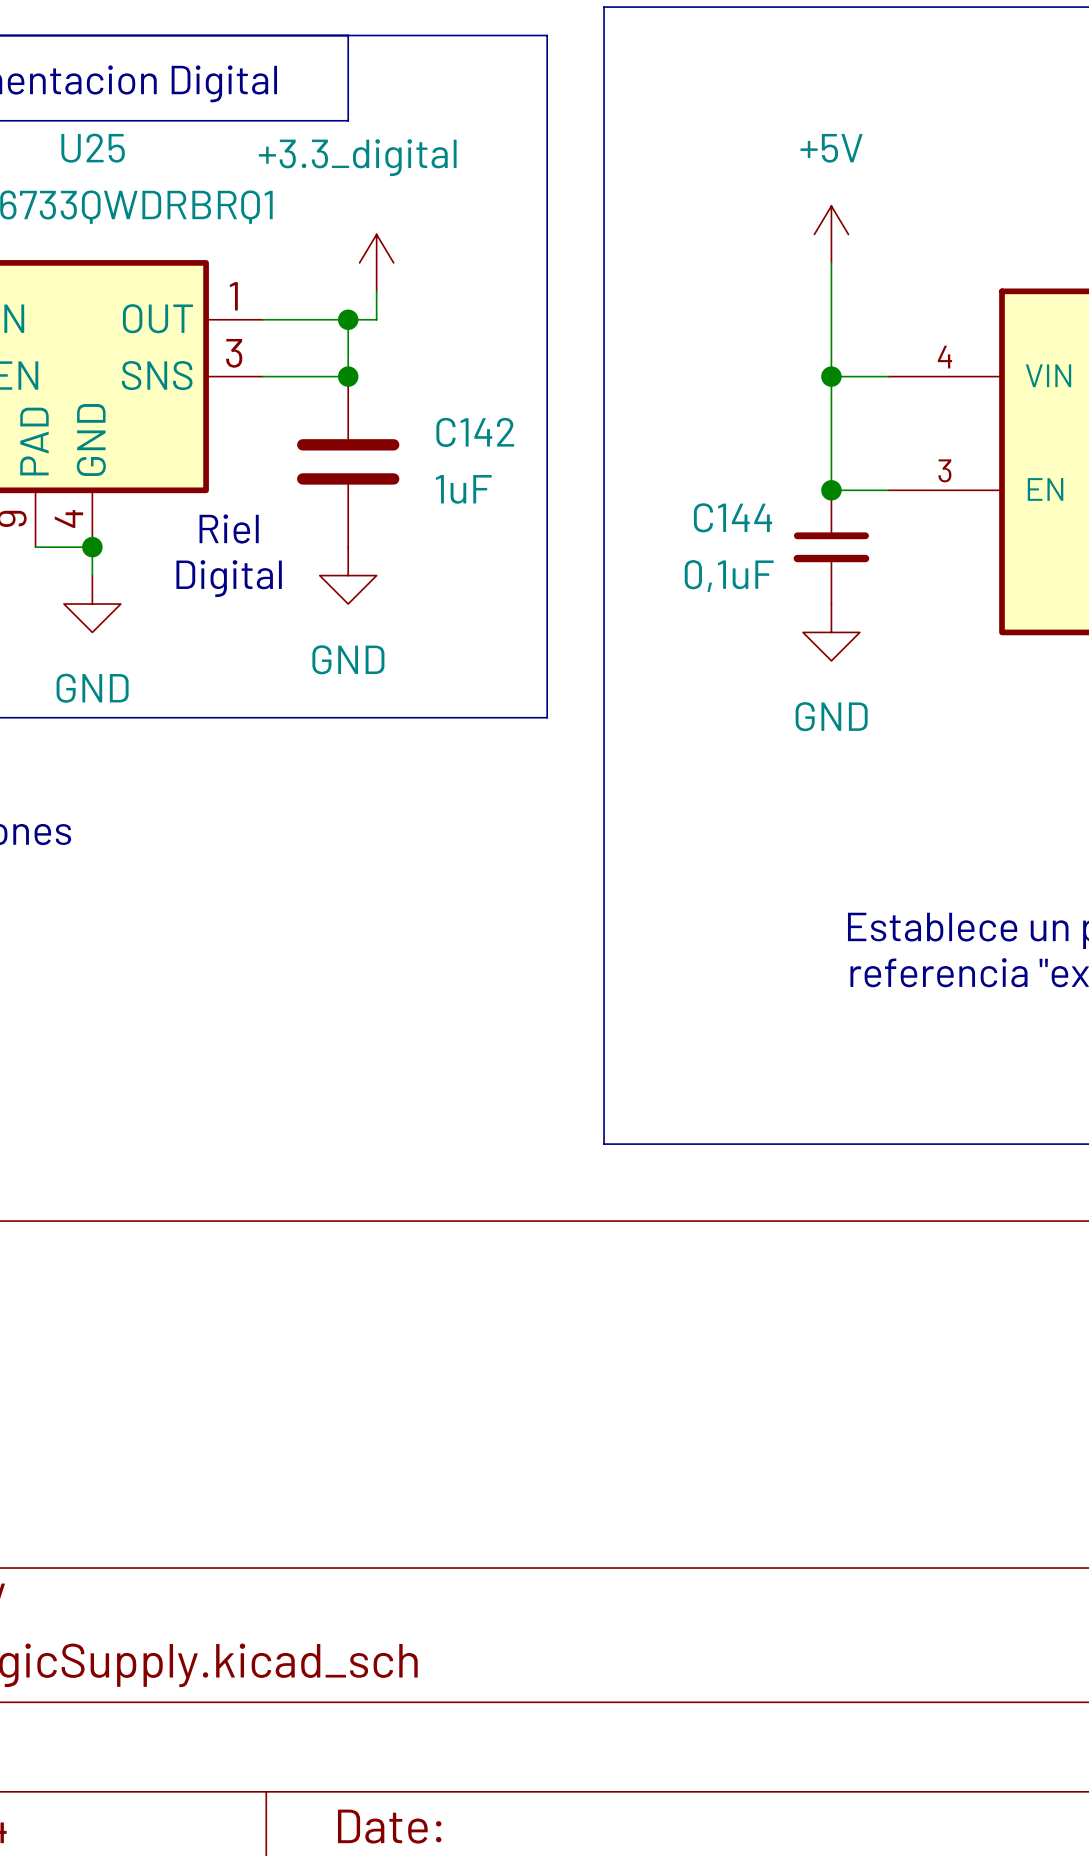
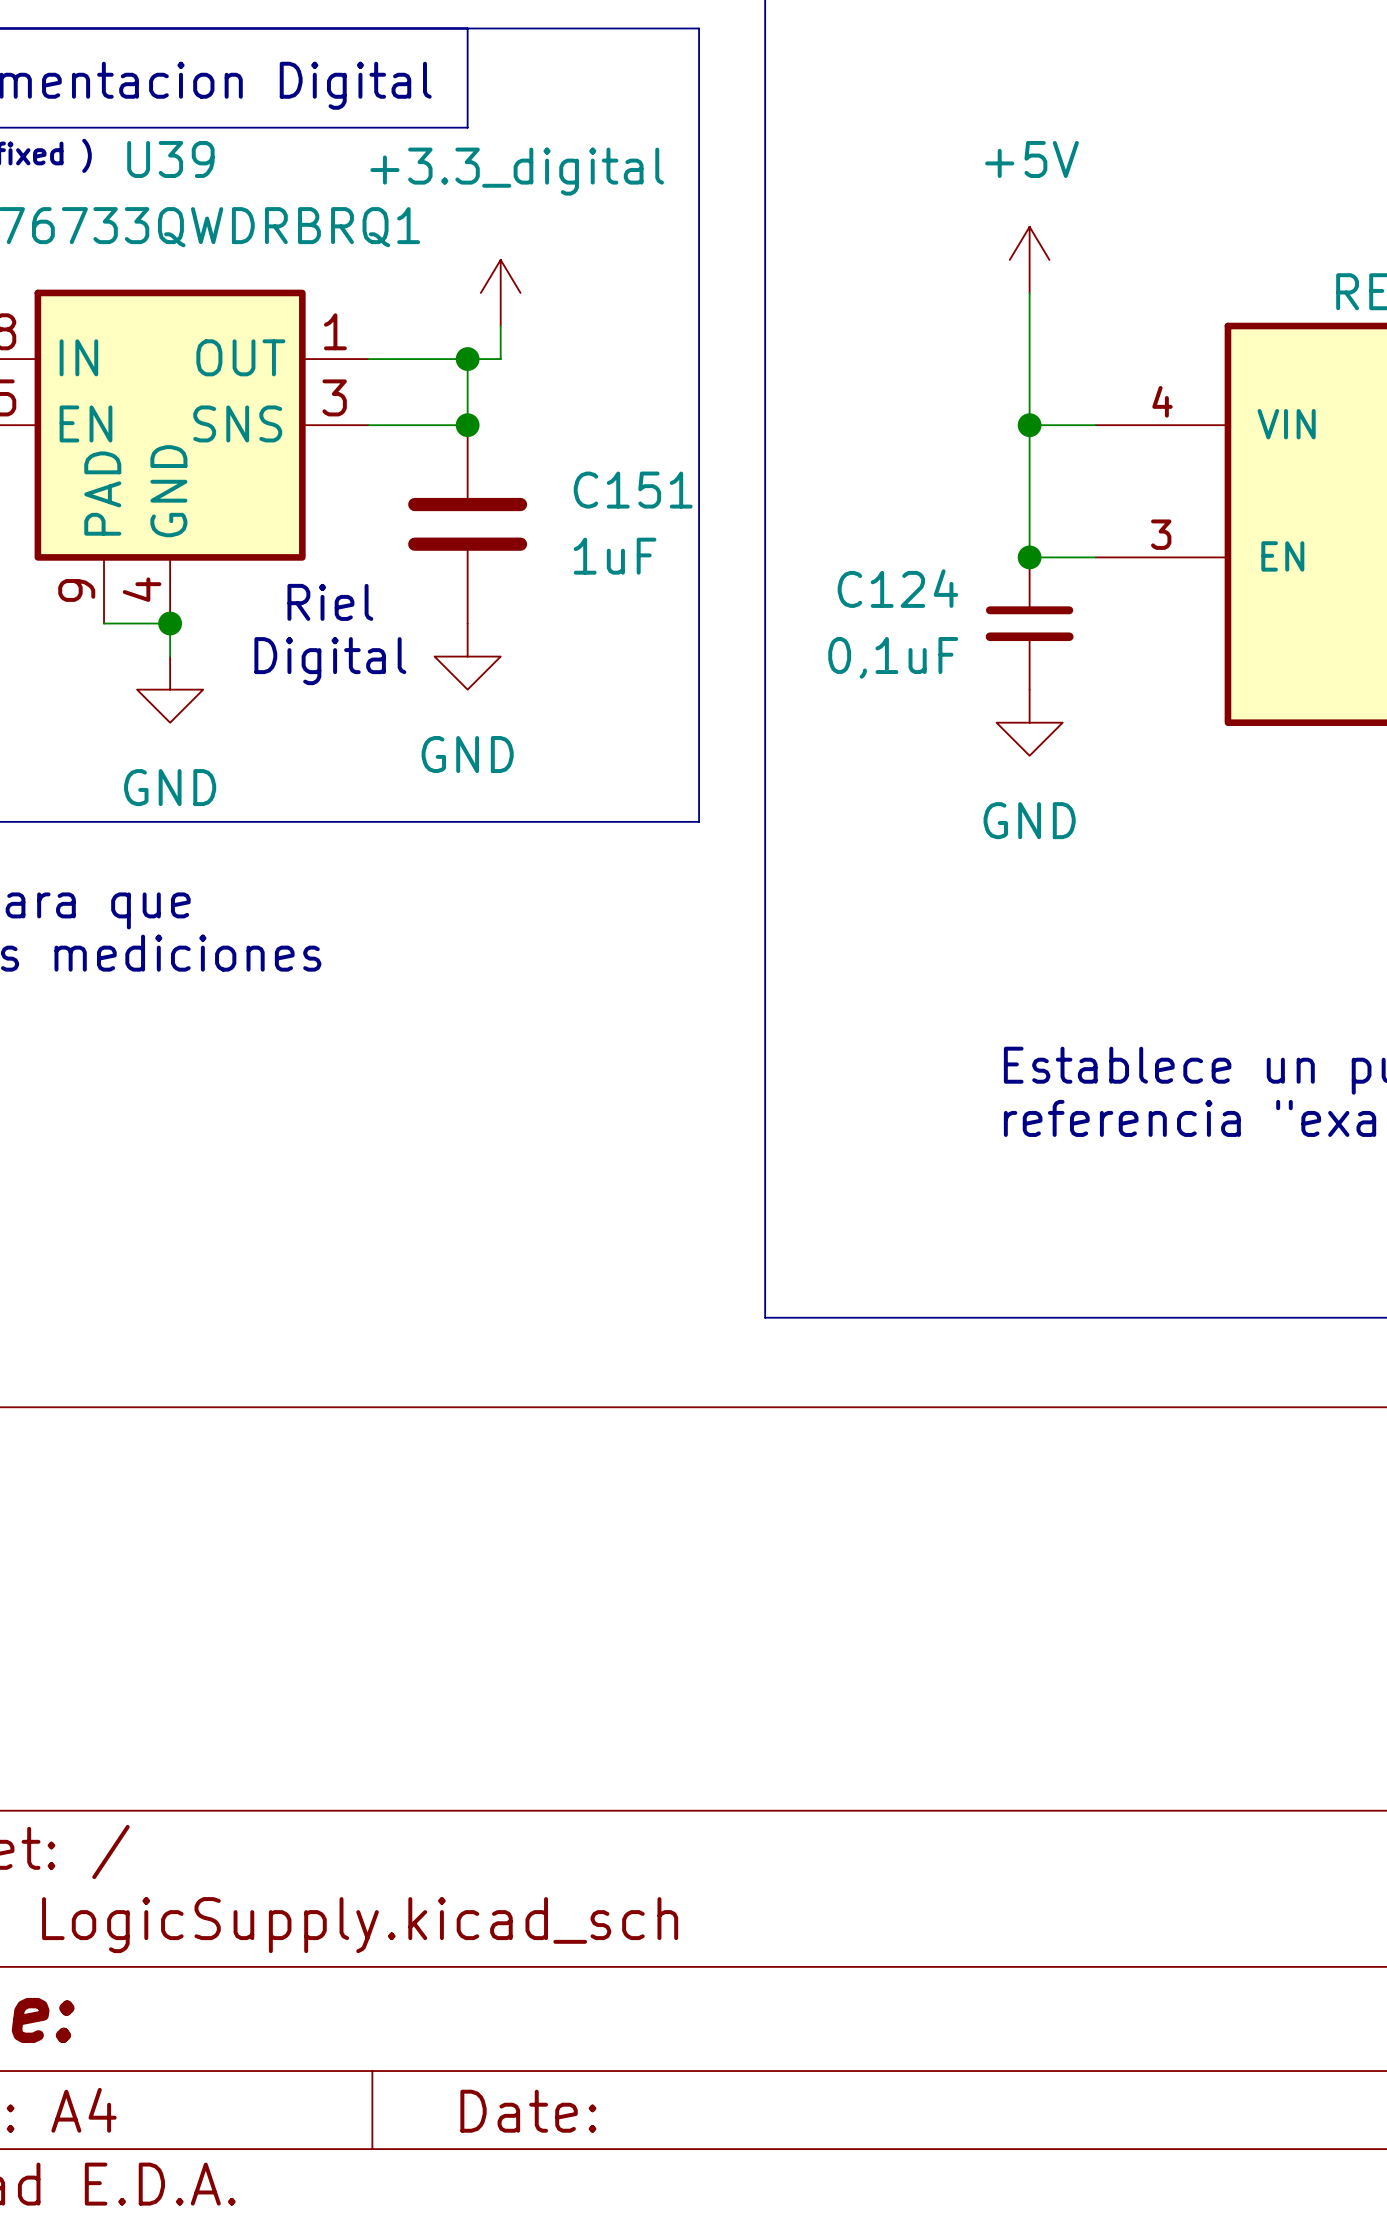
U25 name: U25 (93, 148) -> U39 (170, 159)
C142 name: C142 (475, 432) -> C151 (633, 490)
C144 name: C144 (733, 517) -> C124 (897, 588)

